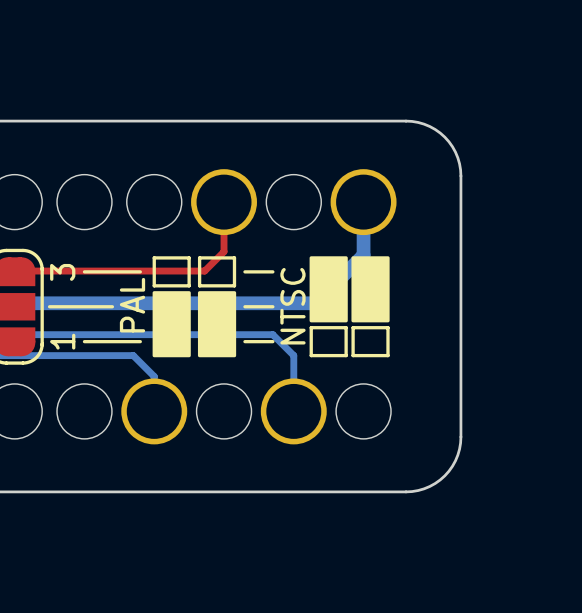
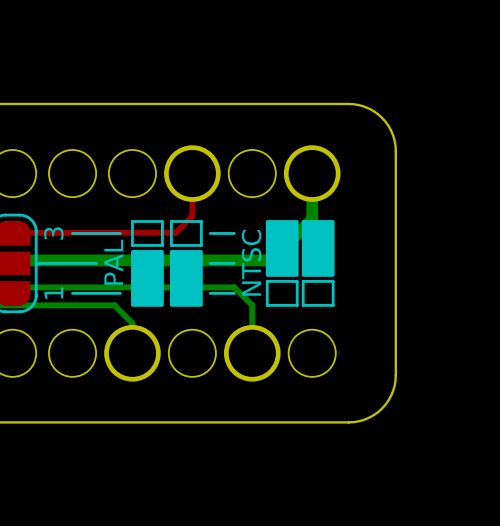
line: none -> (36, 263) (42, 263)

